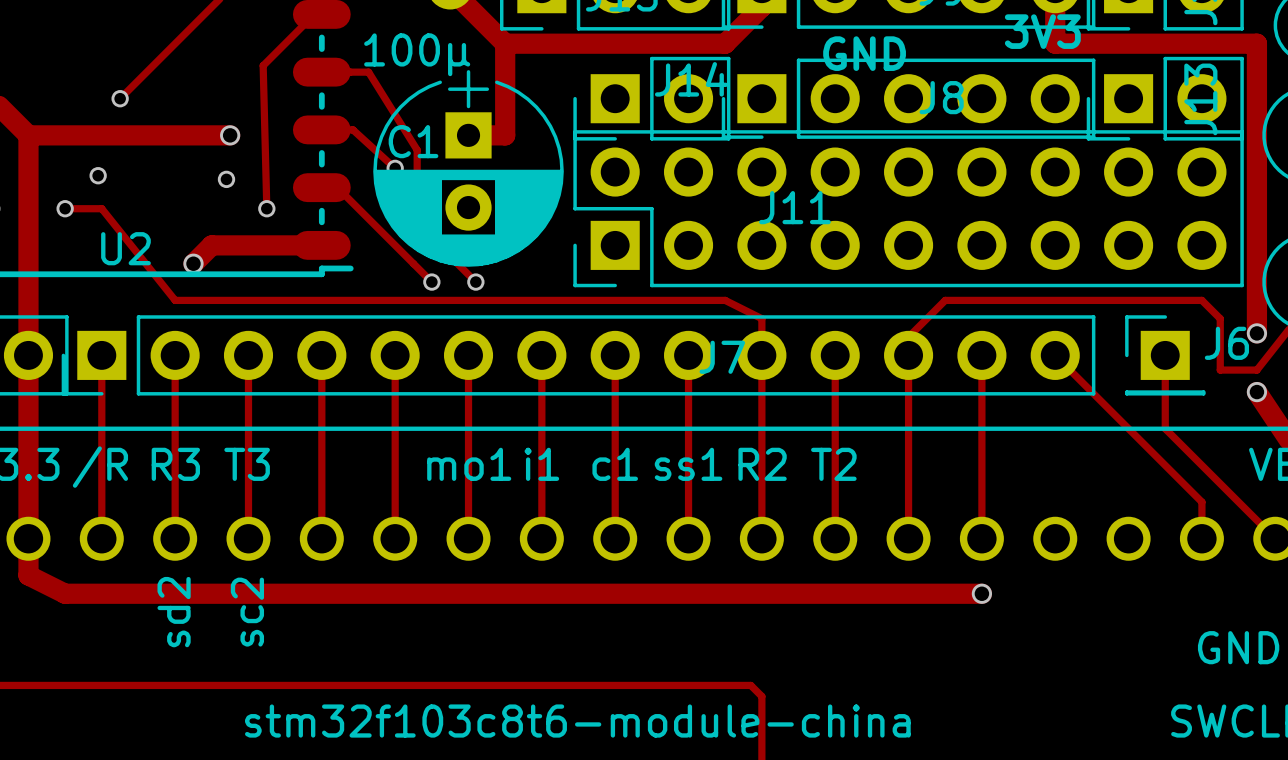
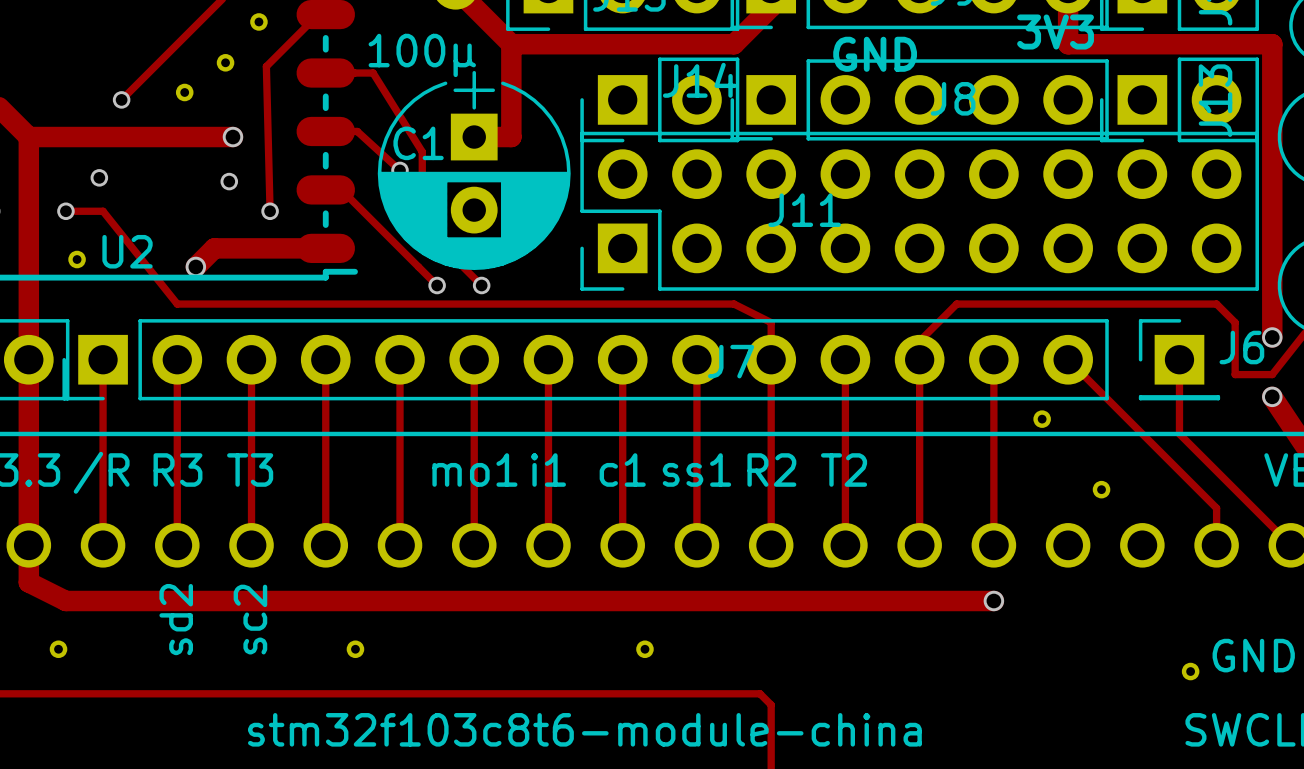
part: none -> (258, 21)
part: none -> (225, 62)
part: none -> (184, 92)
part: none -> (77, 259)
part: none -> (1042, 419)
part: none -> (1101, 489)
part: none -> (58, 649)
part: none -> (355, 649)
part: none -> (644, 649)
part: none -> (1190, 671)

